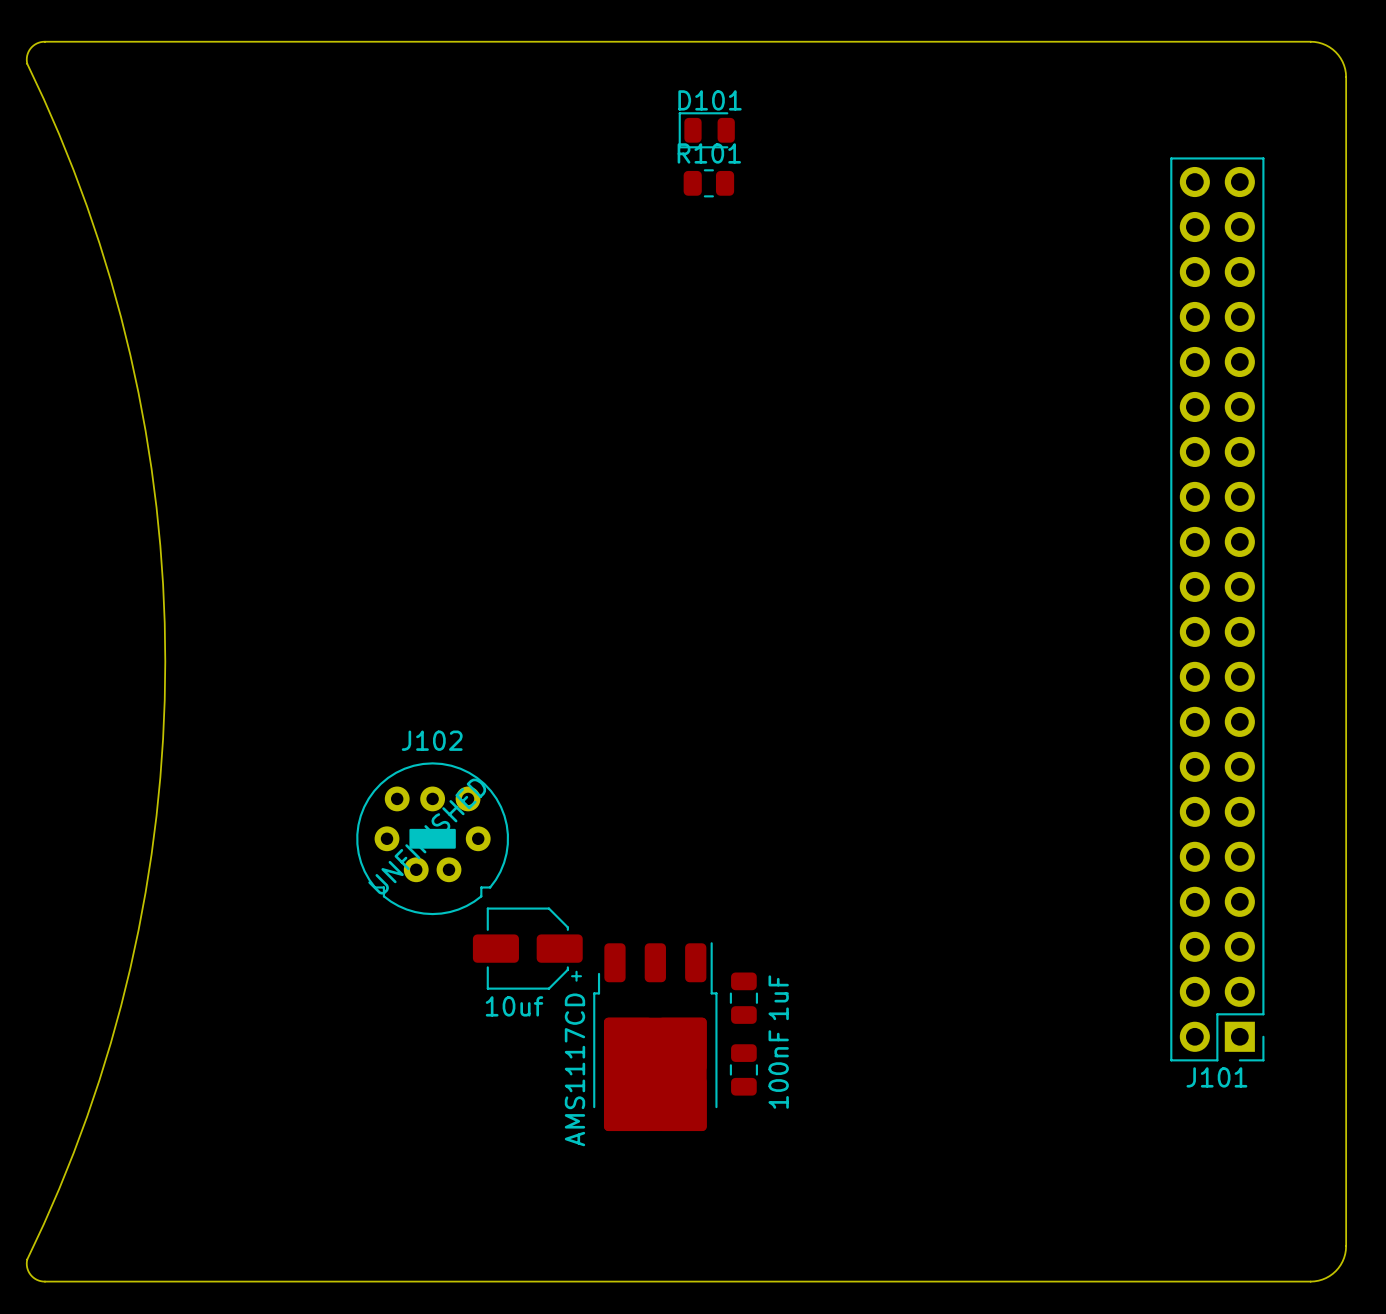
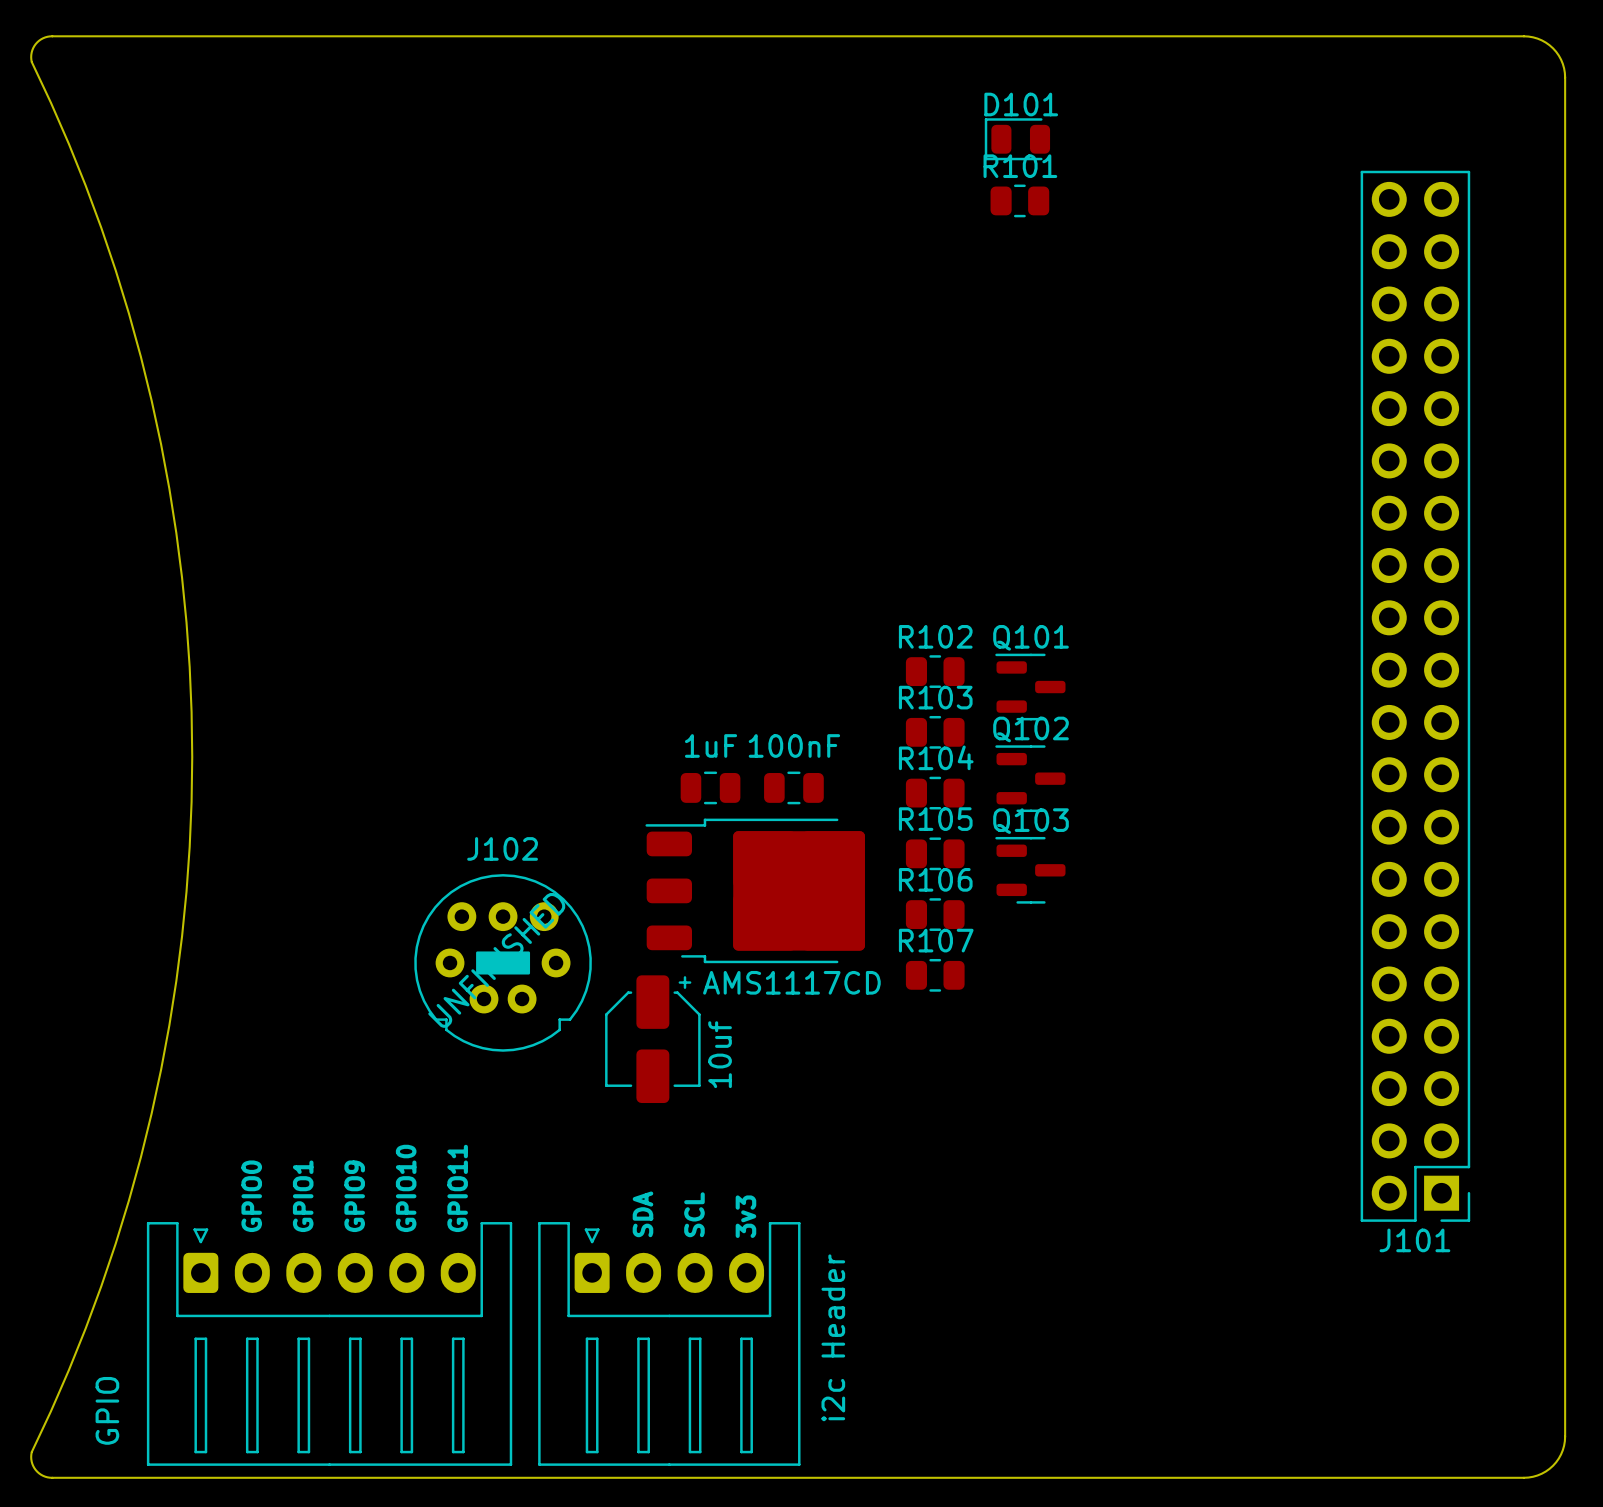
D101 position: (706, 130) -> (1017, 139)
R101 position: (708, 183) -> (1019, 200)
R102: none -> (935, 671)
Q101: none -> (1030, 687)
R103: none -> (935, 732)
Q102: none -> (1030, 778)
R104: none -> (935, 793)
R105: none -> (935, 853)
Q103: none -> (1030, 870)
R106: none -> (935, 914)
R107: none -> (935, 975)
part rotation: 0° (527, 948) -> 90° counterclockwise (652, 1039)
part value position: 1uF (778, 997) -> 1uF (711, 745)
part rotation: 0° (743, 998) -> 90° clockwise (710, 787)
part position: (743, 998) -> (710, 787)
text: none -> GPIO10 (406, 1188)
text: none -> GPIO11 (457, 1188)
part rotation: 0° (655, 1036) -> 90° counterclockwise (755, 890)
part position: (655, 1036) -> (755, 890)
text: none -> GPIO0 (251, 1196)
text: none -> GPIO1 (303, 1196)
text: none -> GPIO9 (354, 1196)
text: none -> SDA (642, 1214)
text: none -> SCL (694, 1214)
text: none -> 3v3 (745, 1216)
part rotation: 0° (743, 1069) -> 90° clockwise (793, 787)
part position: (743, 1069) -> (793, 787)
part value position: 100nF (778, 1069) -> 100nF (794, 745)
part: none -> GPIO (329, 1343)
part: none -> i2c Header (669, 1343)

